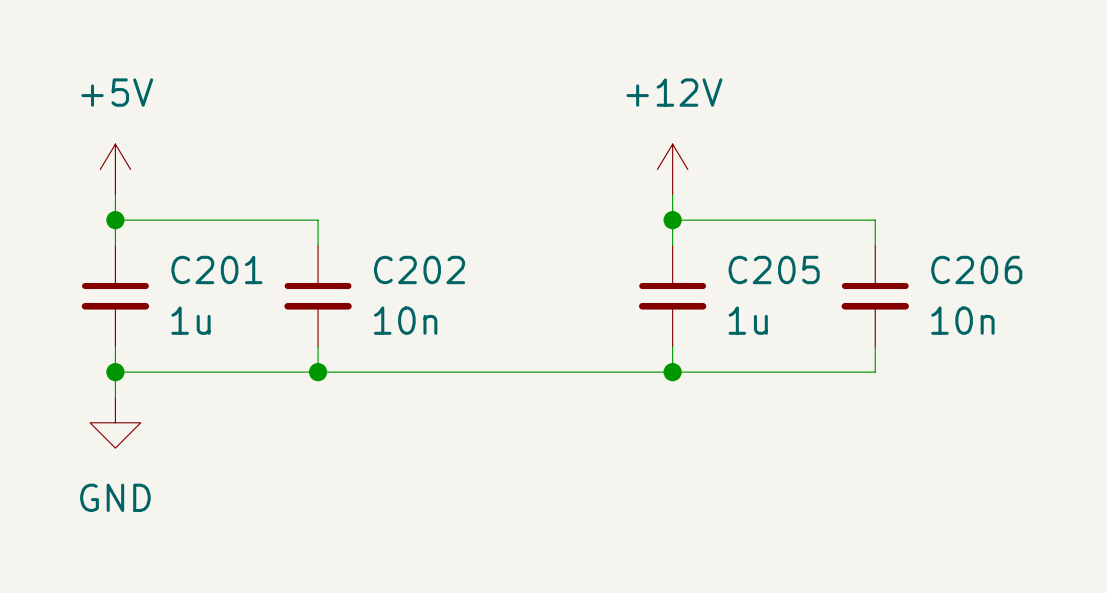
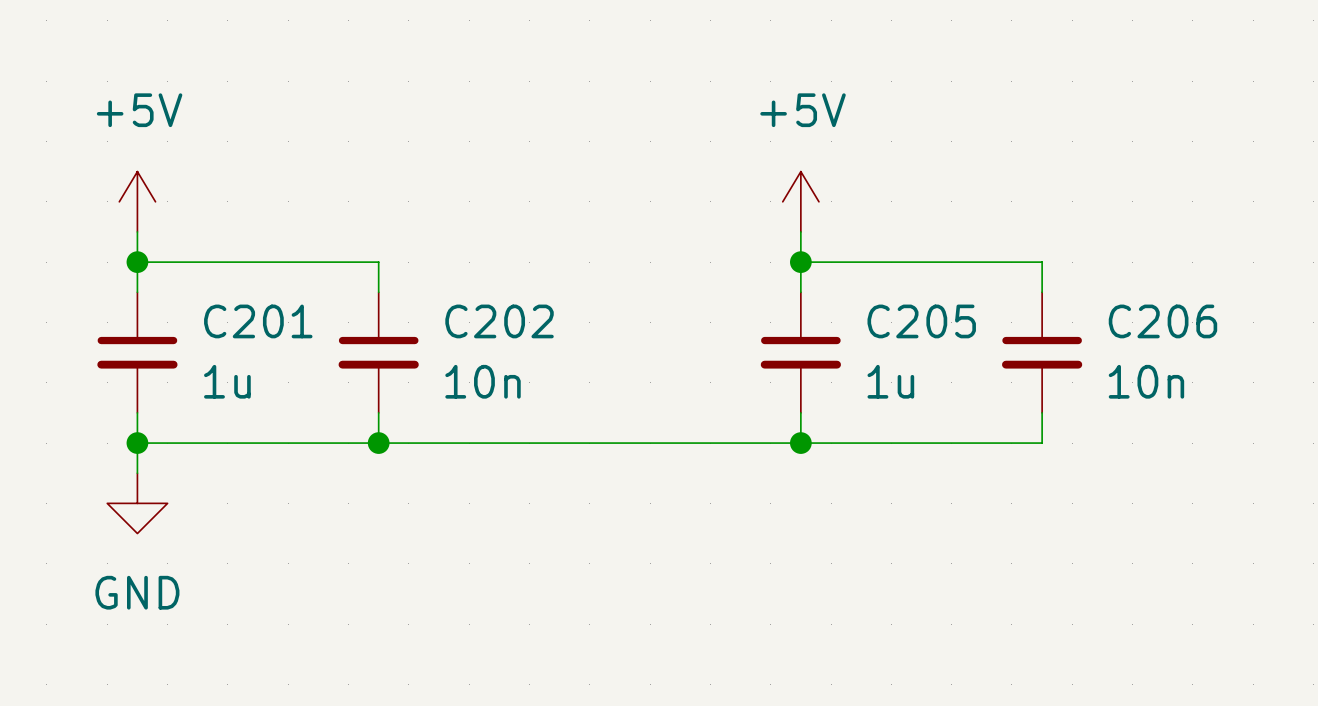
power symbol: +12V (672, 169) -> +5V (800, 201)

